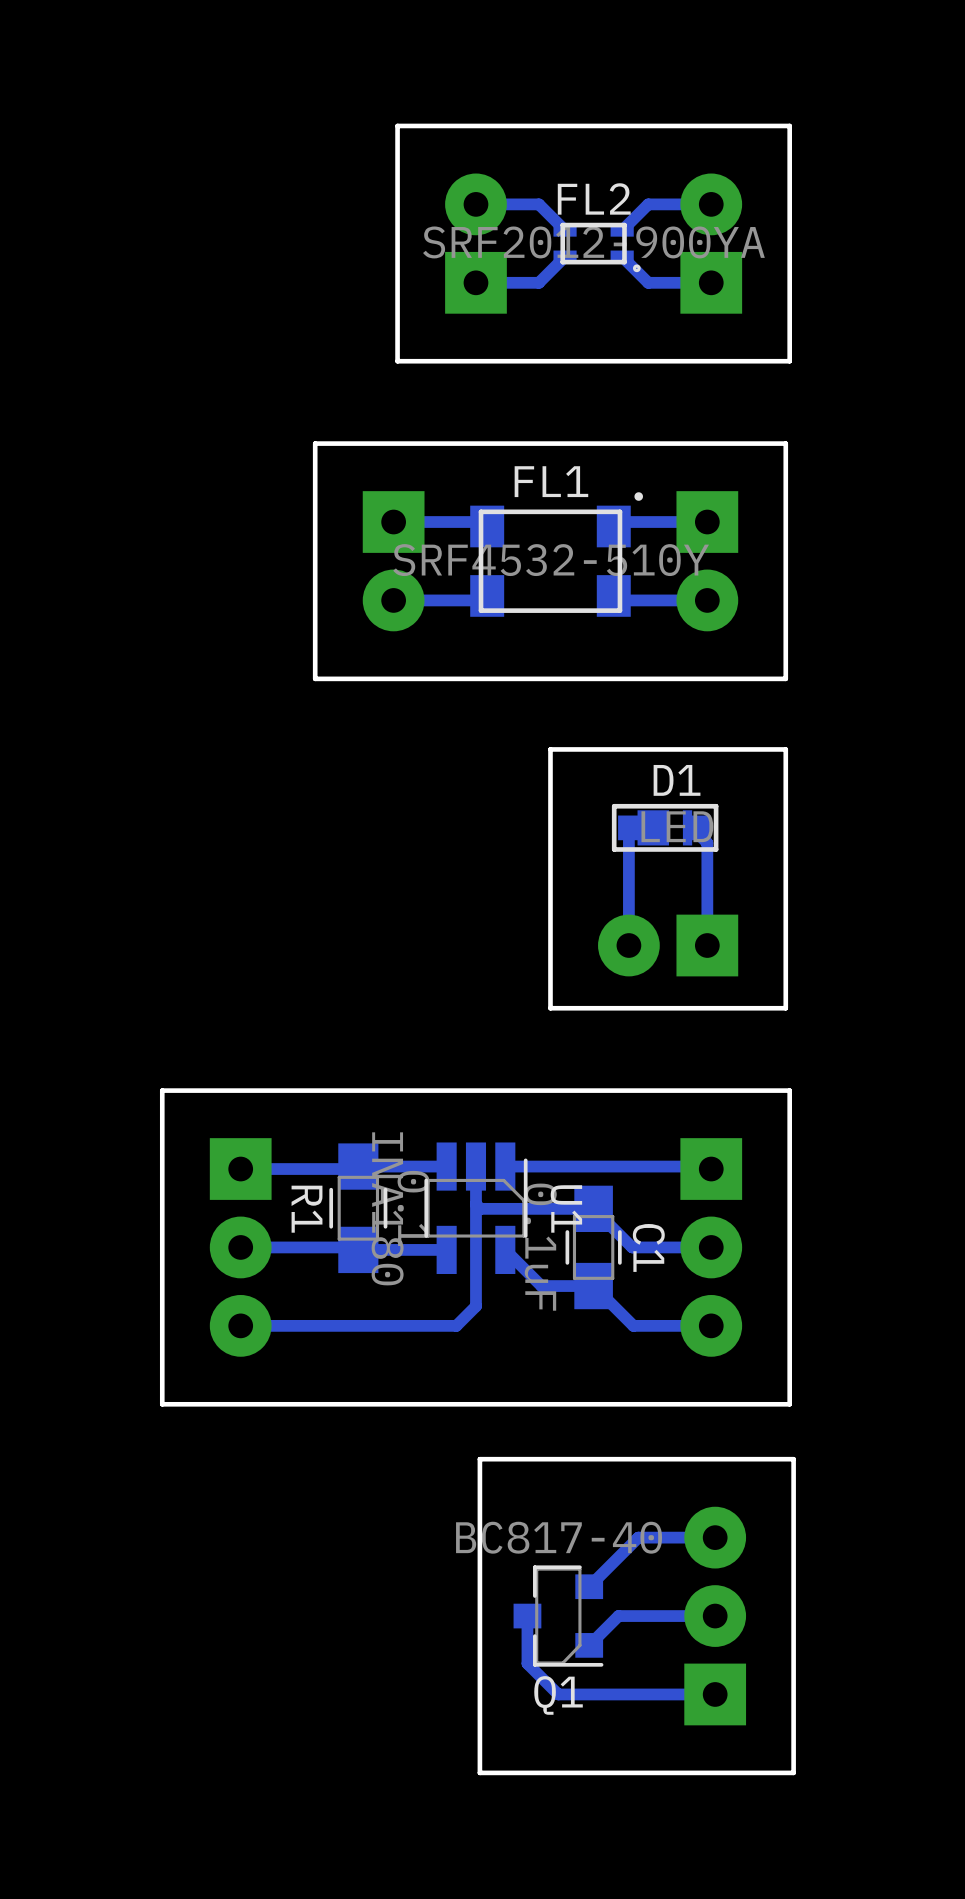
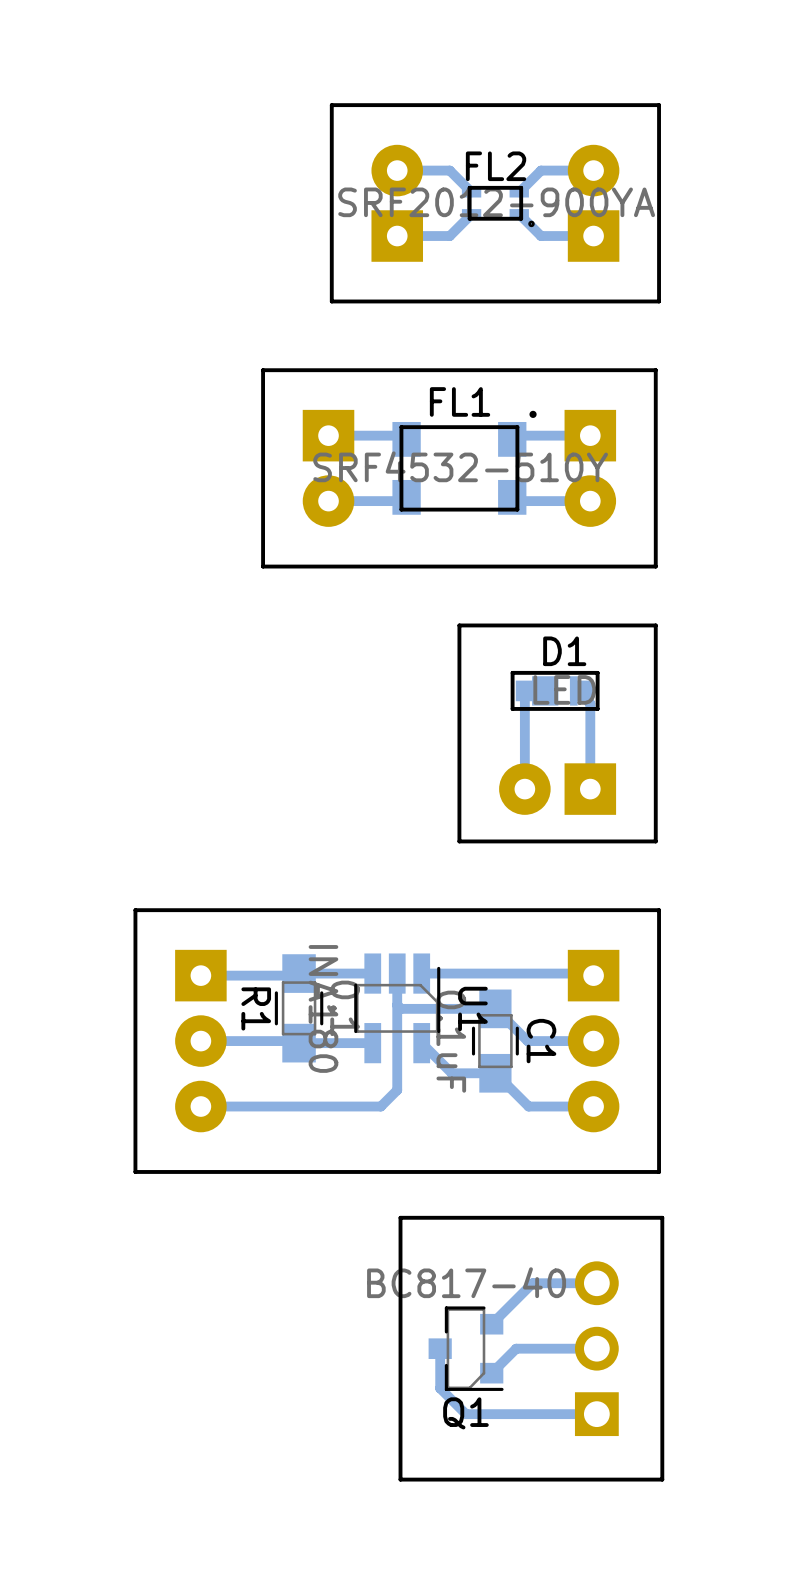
part footprint: [684, 1506, 747, 1726] -> [574, 1261, 619, 1437]

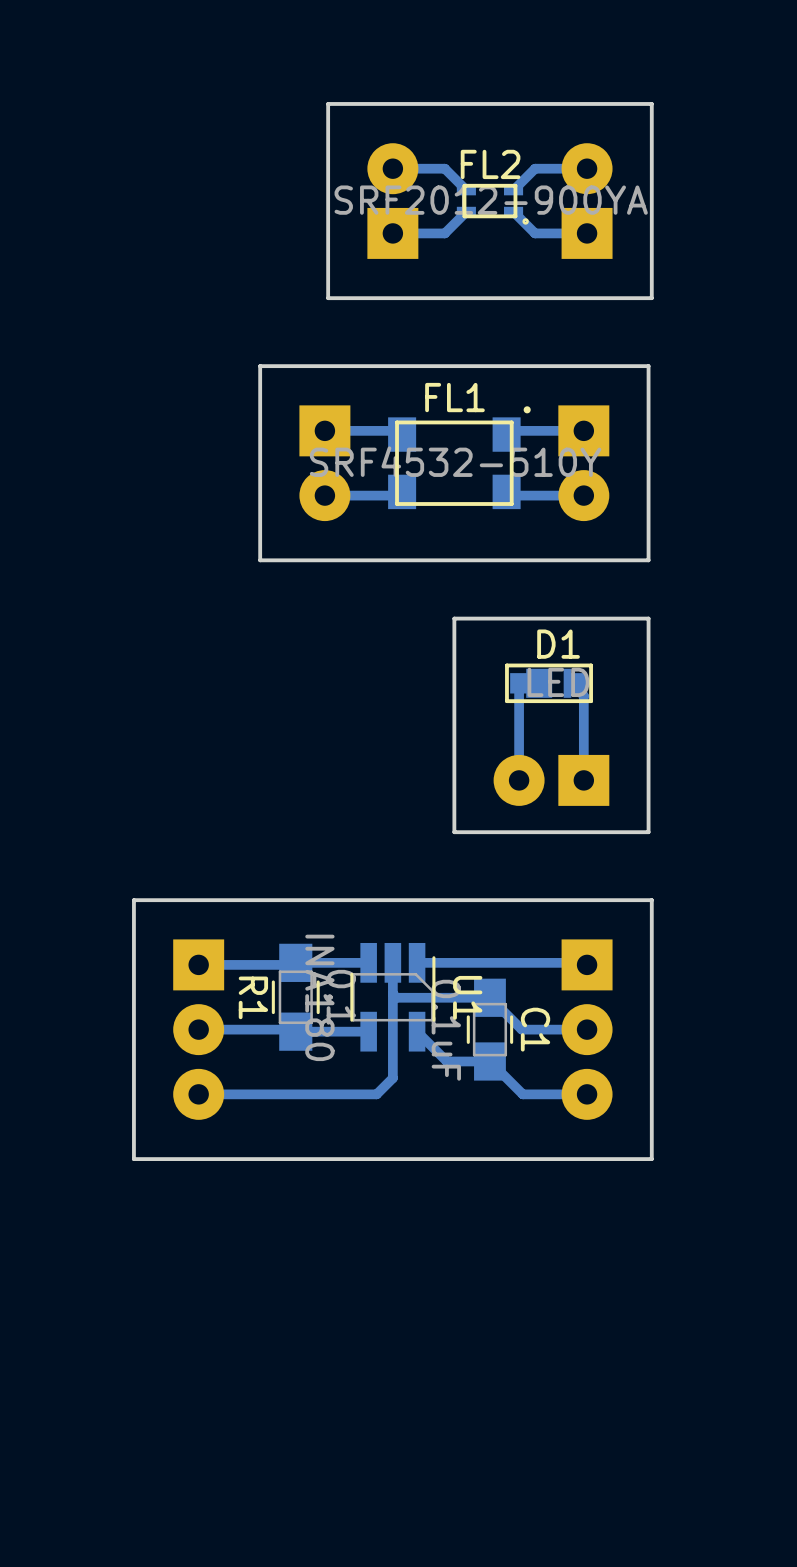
board edge: (662, 1217) (400, 1217) (400, 1479) (662, 1479) (662, 1217) -> none
track: (596, 1283) (532, 1283) (491, 1324) -> none
track: (440, 1348) (440, 1388) (465, 1414) (596, 1414) -> none
Q1: BC817-40 (466, 1348) -> none
track: (596, 1348) (516, 1348) (491, 1373) -> none
part: (596, 1348) -> none

